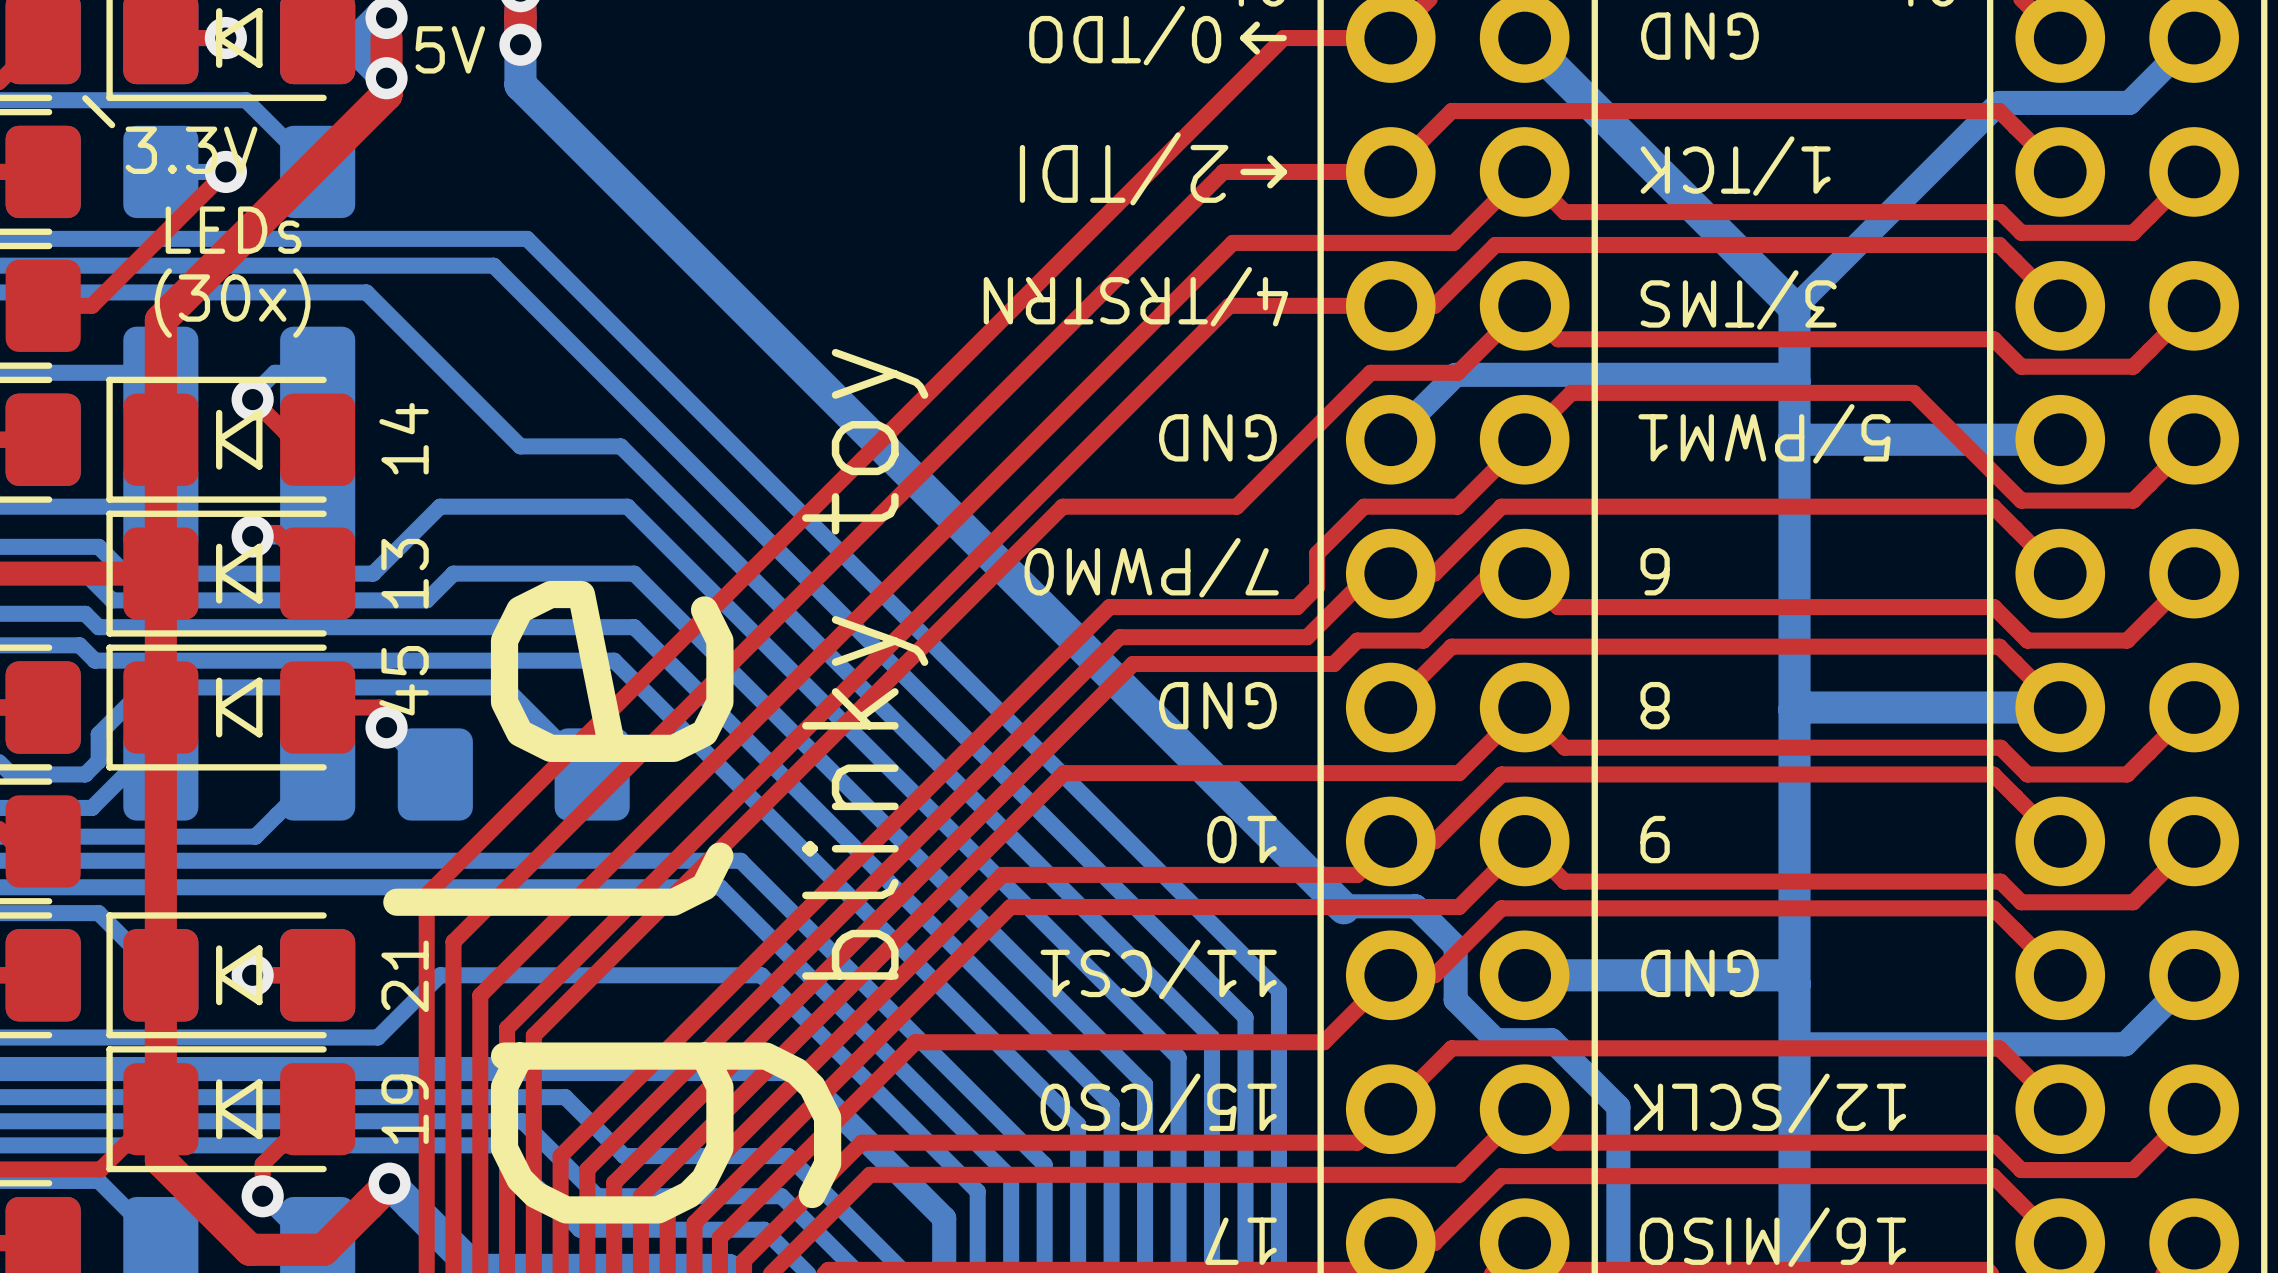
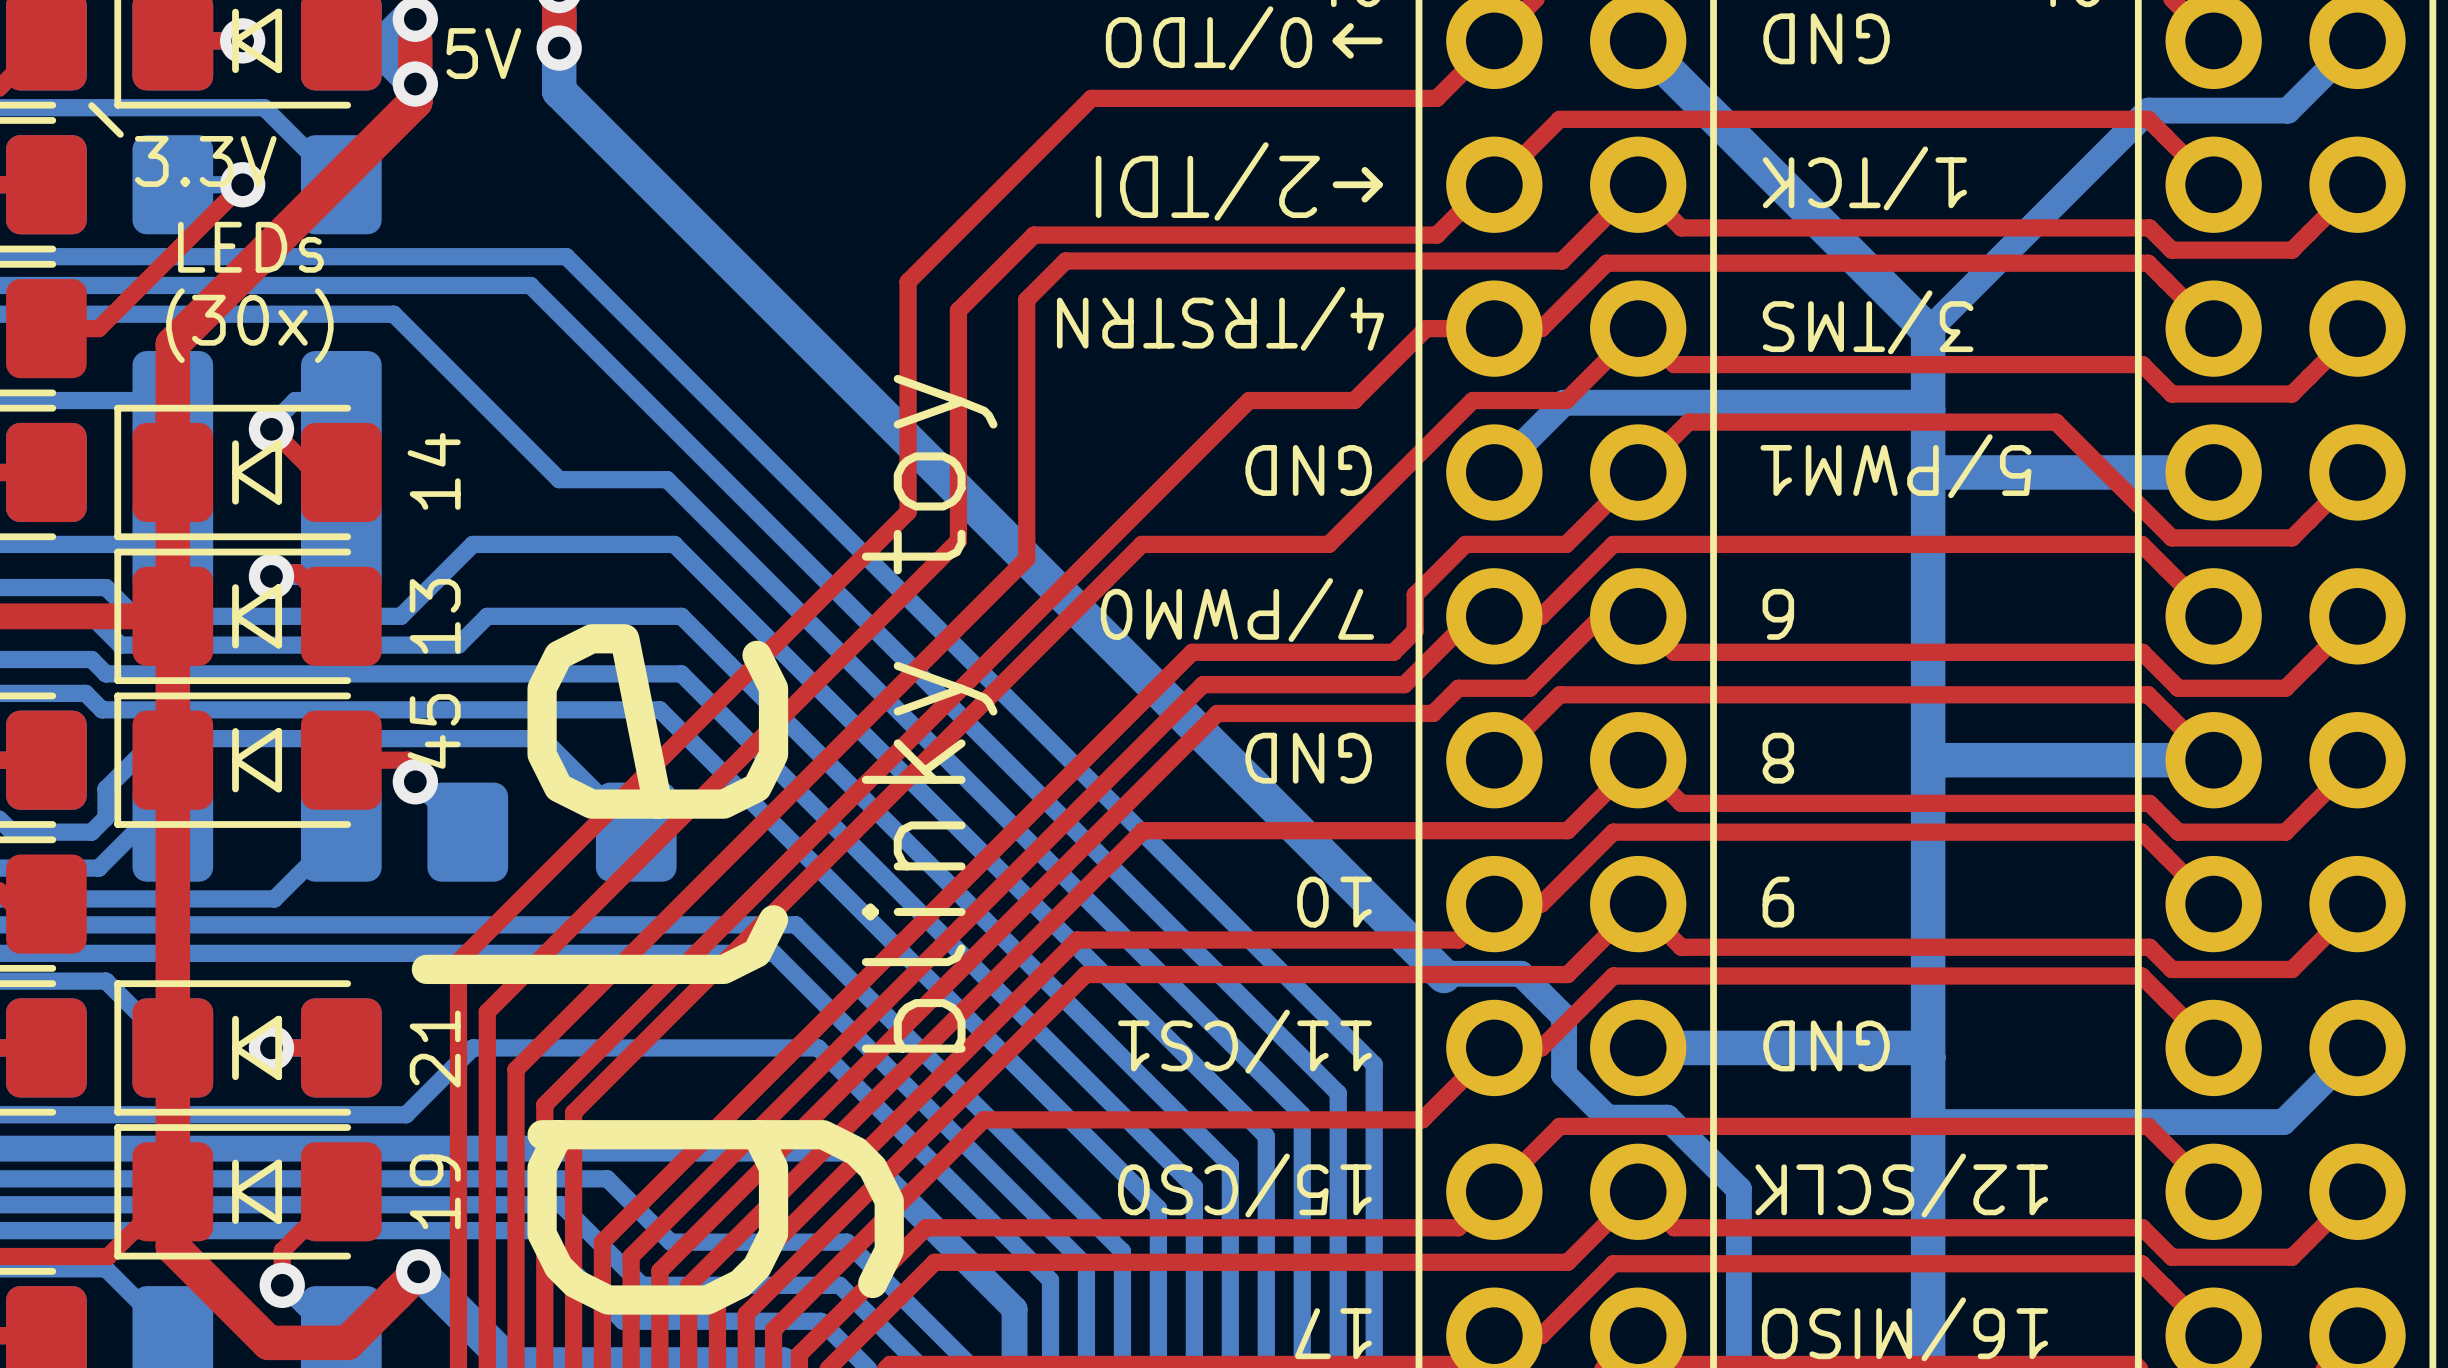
top track: (1390, 38) (1283, 38) (845, 476) -> (1494, 40) (1436, 98) (1091, 98) (908, 281) (908, 512)
top track: (1384, 171) (1223, 171) (892, 503) -> (1487, 184) (1436, 235) (1033, 235) (958, 310) (958, 540)
top track: (1232, 242) (955, 520) -> (1324, 260) (1065, 260) (1026, 299) (1026, 558)
top track: (1327, 305) (1229, 305) (1162, 372) -> (1426, 328) (1354, 400) (1249, 400)

